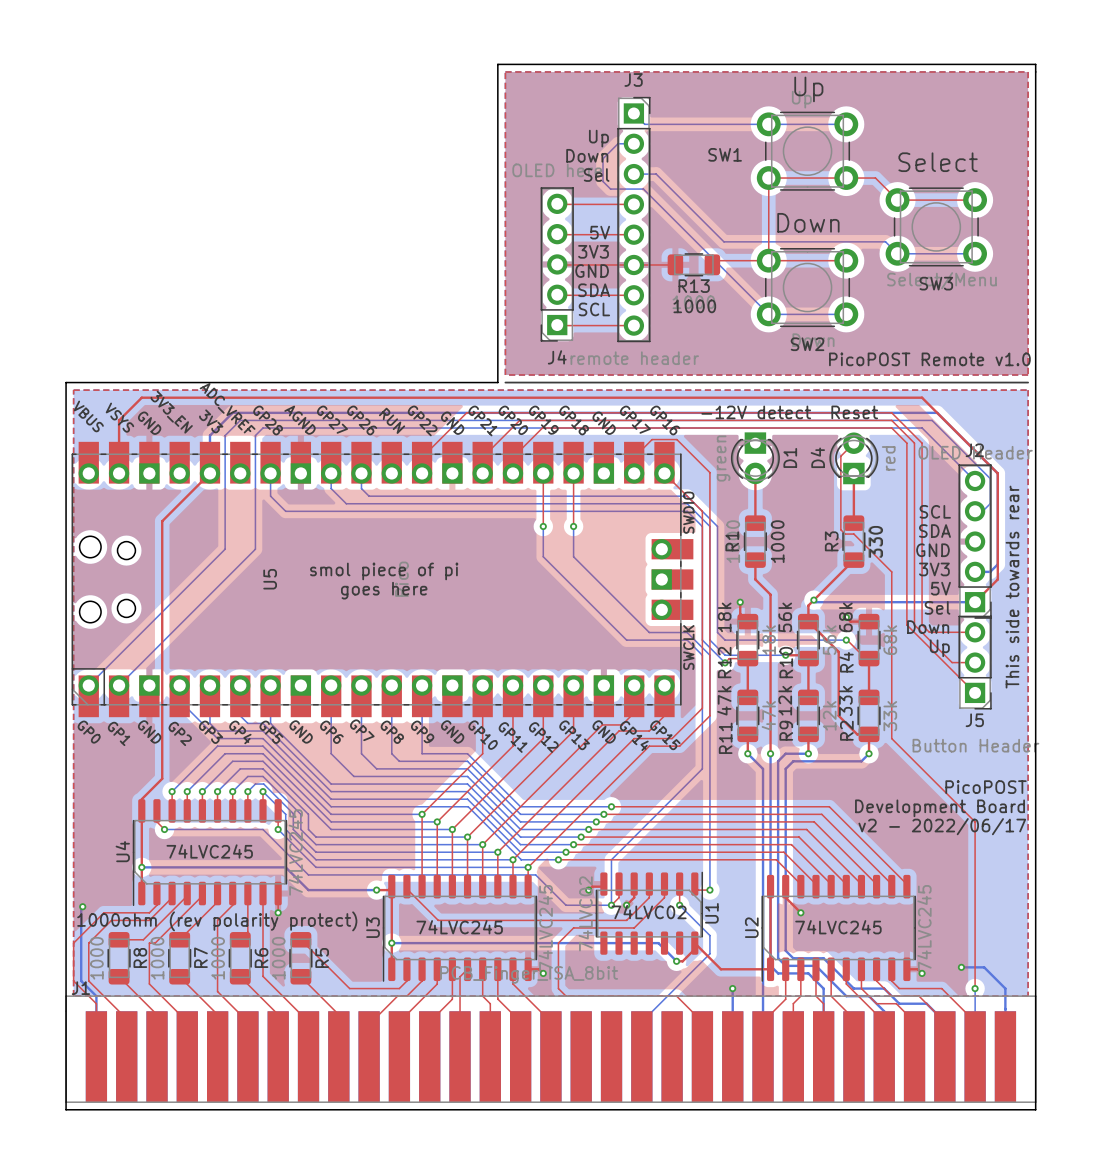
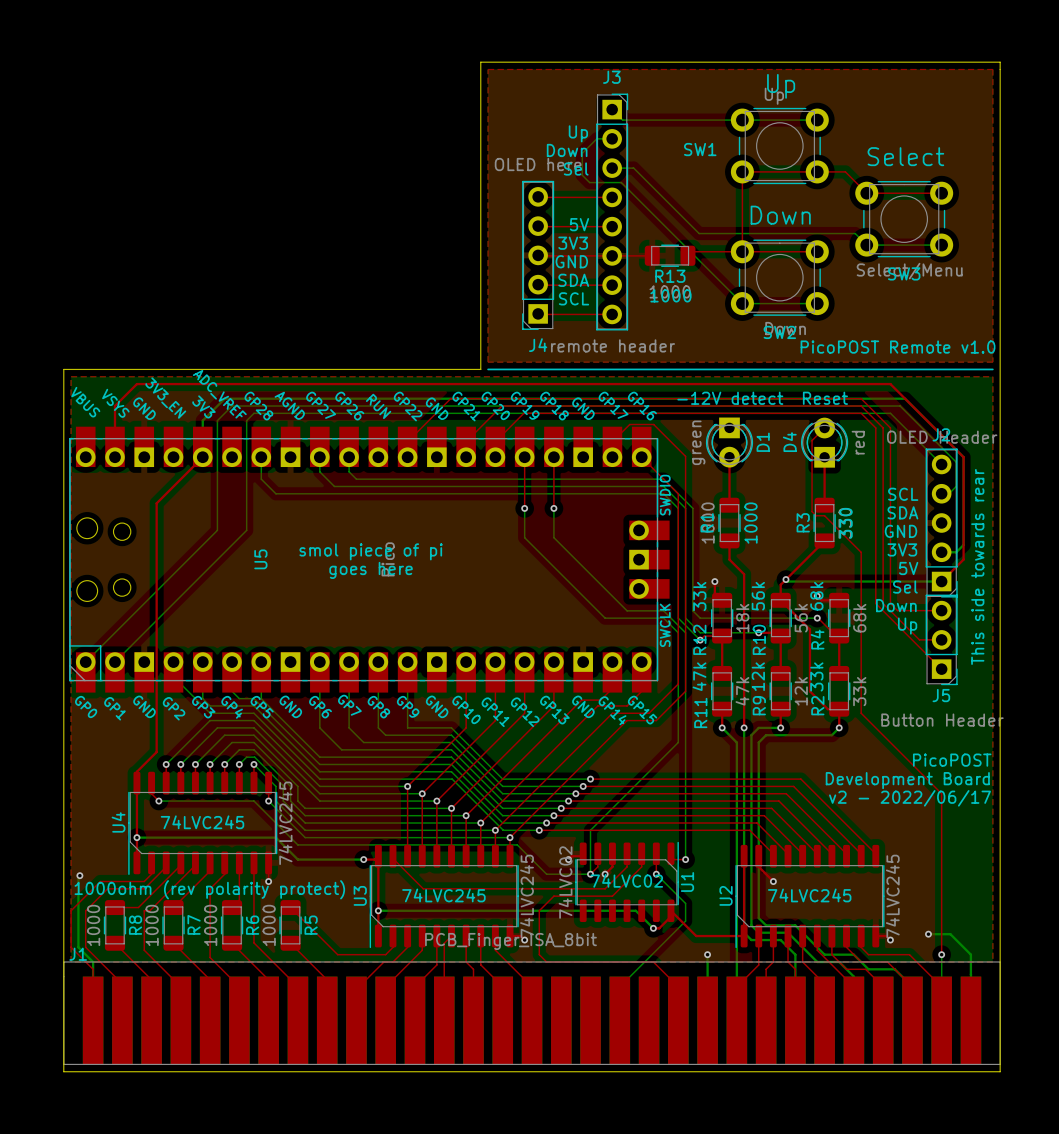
text: 18k (724, 617) -> 33k (699, 596)

